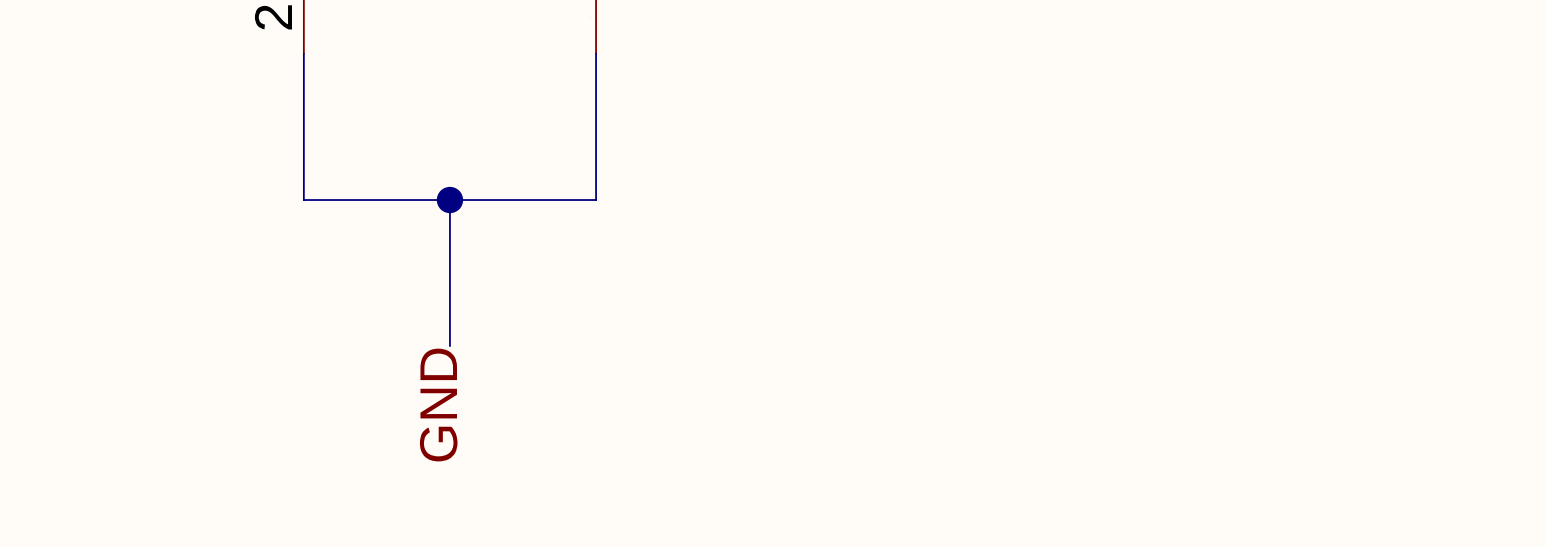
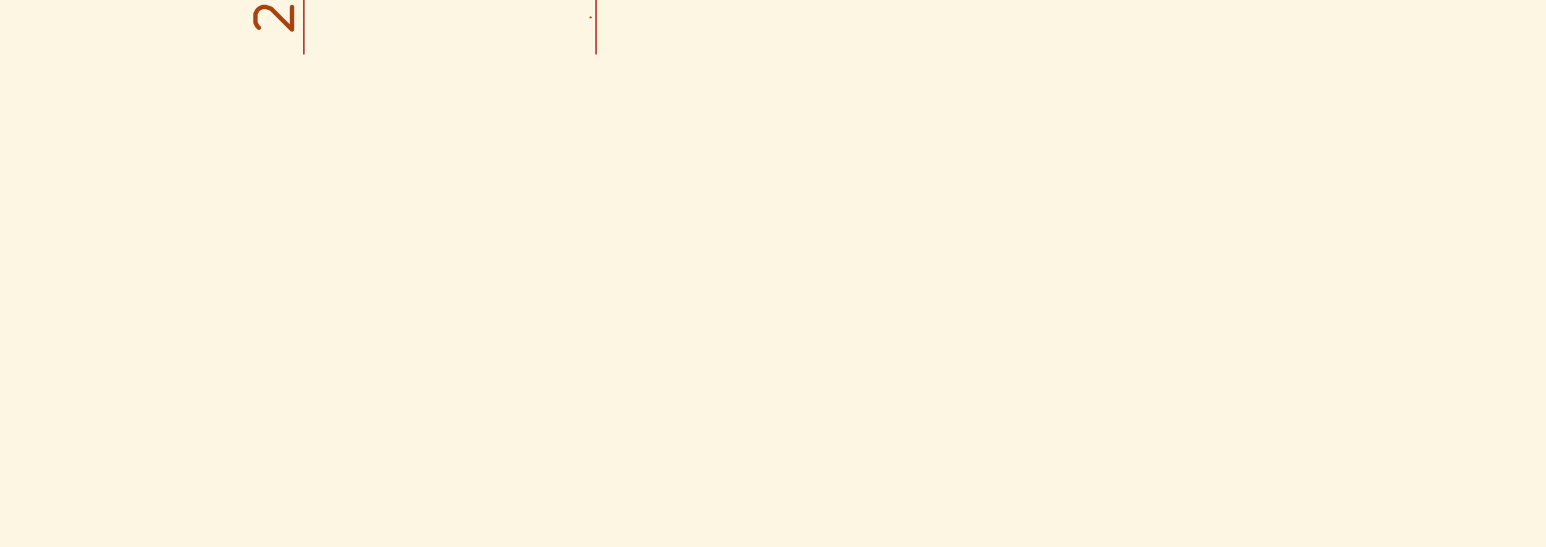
wire: (303, 53) (303, 200) (596, 200) (596, 53) -> none
wire: (449, 200) (449, 346) -> none
junction: (449, 200) -> none
label: GND (438, 405) -> none

